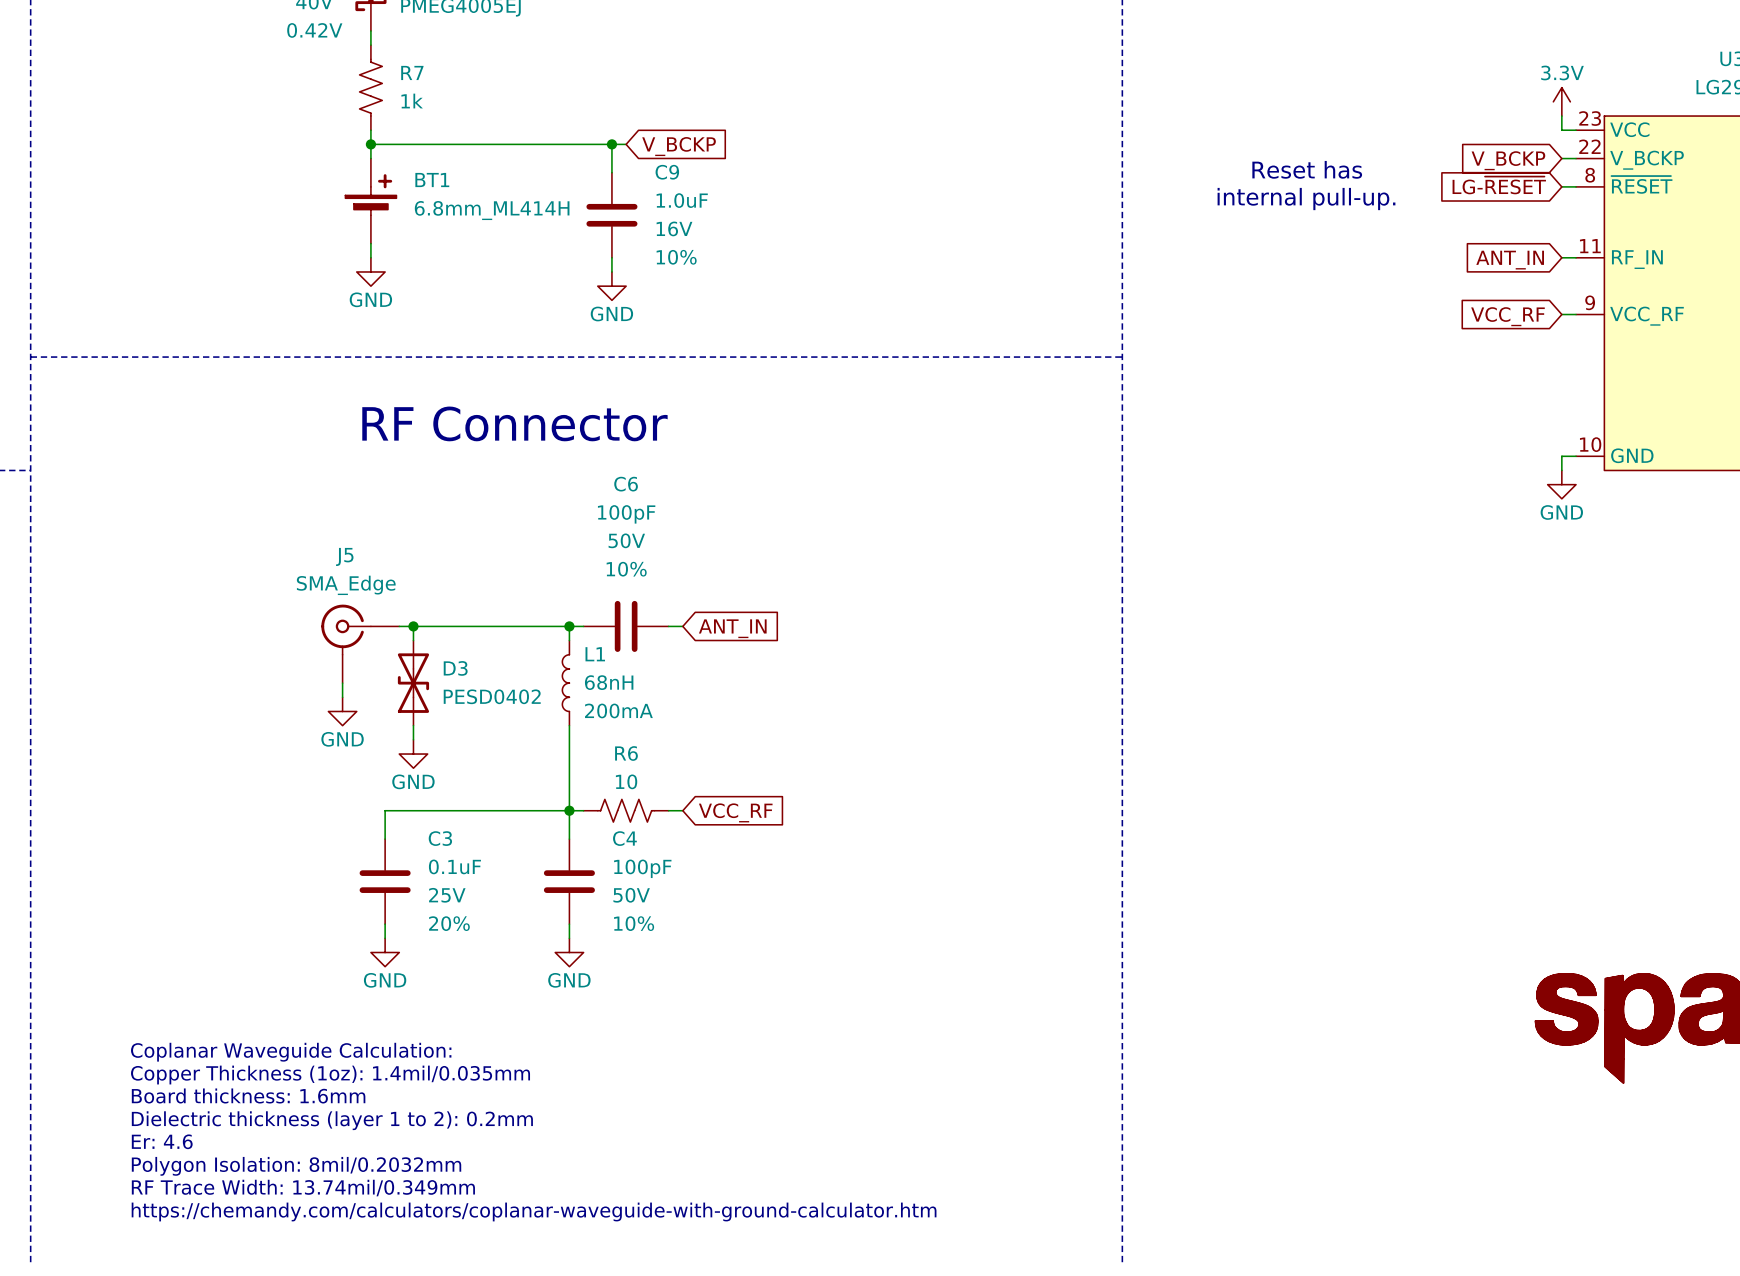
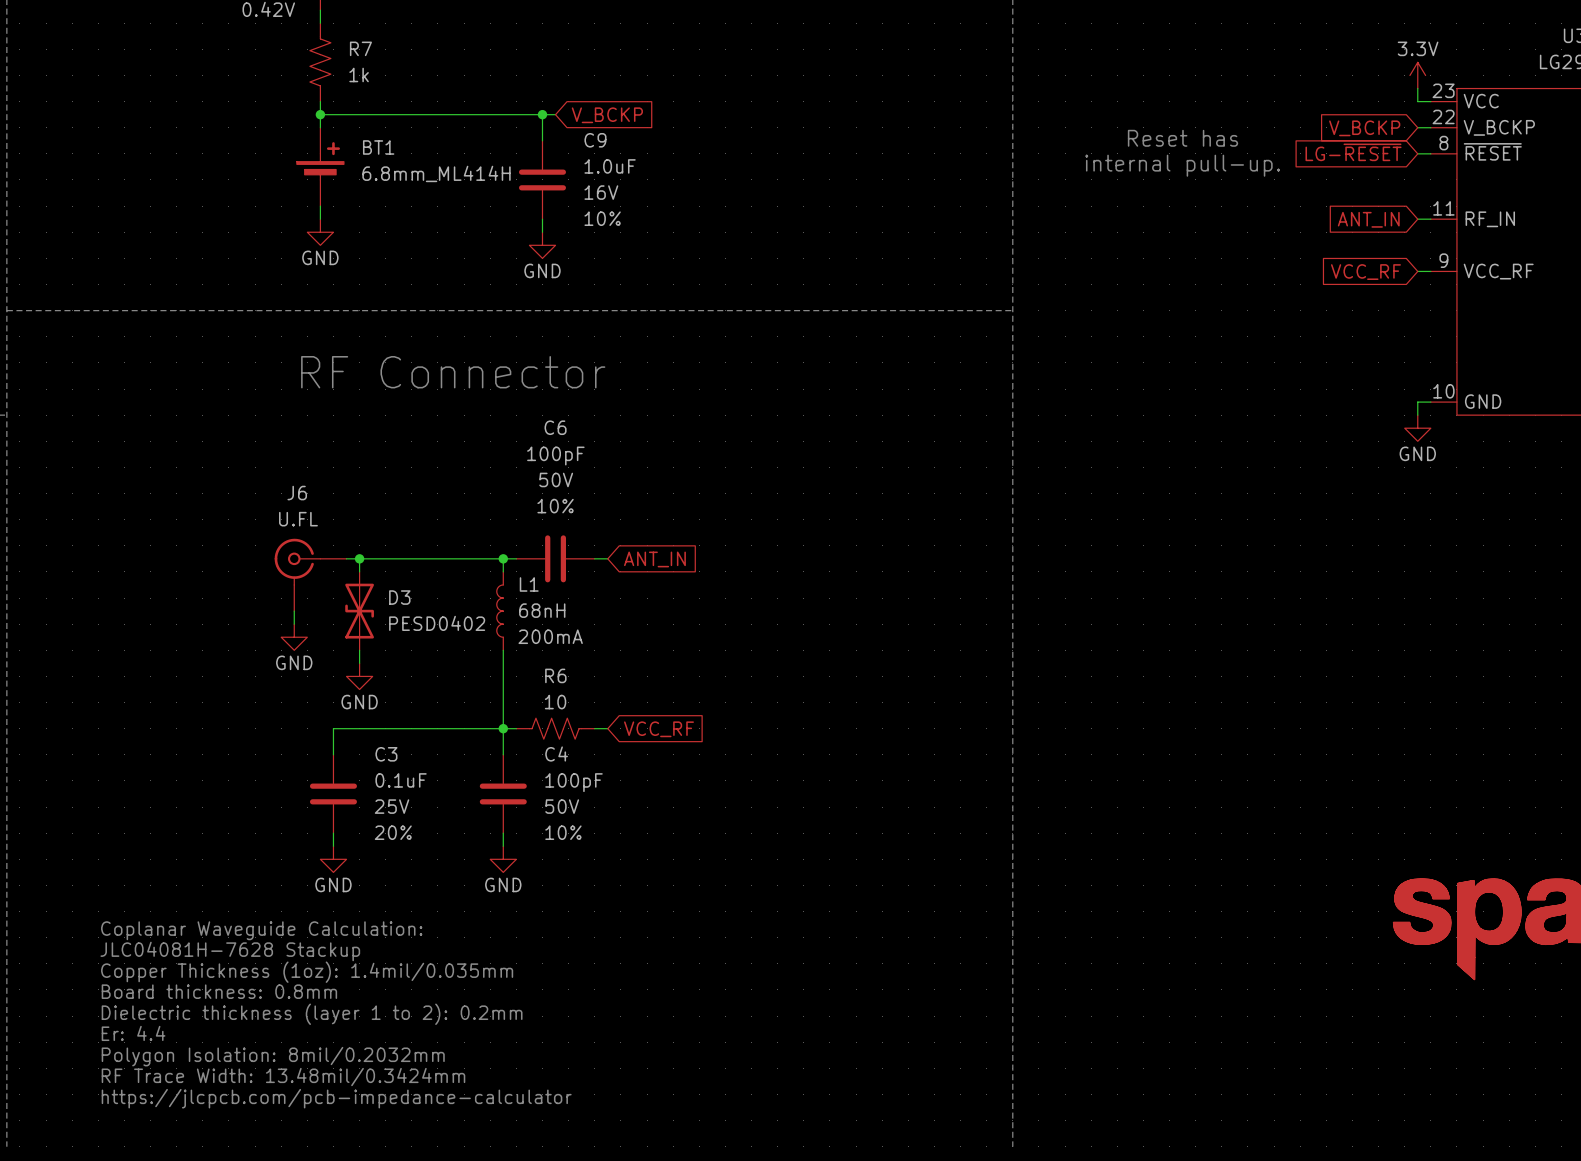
J5 name: J5 (344, 556) -> J6 (297, 493)
J5 value: SMA_Edge (346, 585) -> U.FL (298, 519)
text: none -> Coplanar Waveguide Calculation: (261, 930)
text: Coplanar Waveguide Calculation: (291, 1052) -> JLC04081H-7628 Stackup (230, 951)
text: Board thickness: 1.6mm (248, 1095) -> Board thickness: 0.8mm (219, 991)
text: Er: 4.6 (162, 1141) -> Er: 4.4 (133, 1033)
text: RF Trace Width: 13.74mil/0.349mm (303, 1188) -> RF Trace Width: 13.48mil/0.3424mm (283, 1077)
text: https://chemandy.com/calculators/coplanar-waveguide-with-ground-calculator.htm (534, 1211) -> https://jlcpcb.com/pcb-impedance-calculator (336, 1098)

